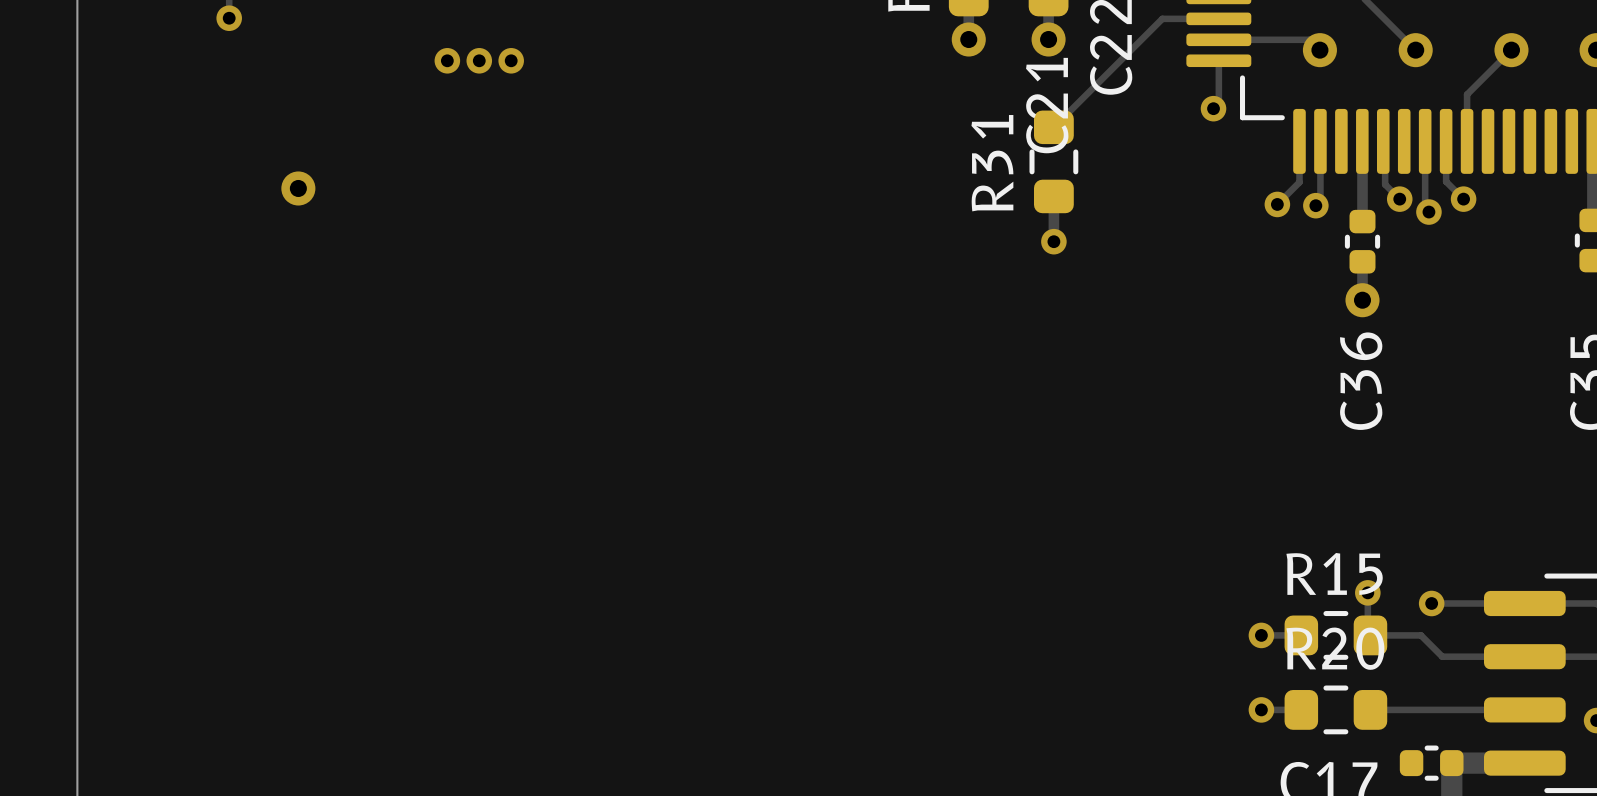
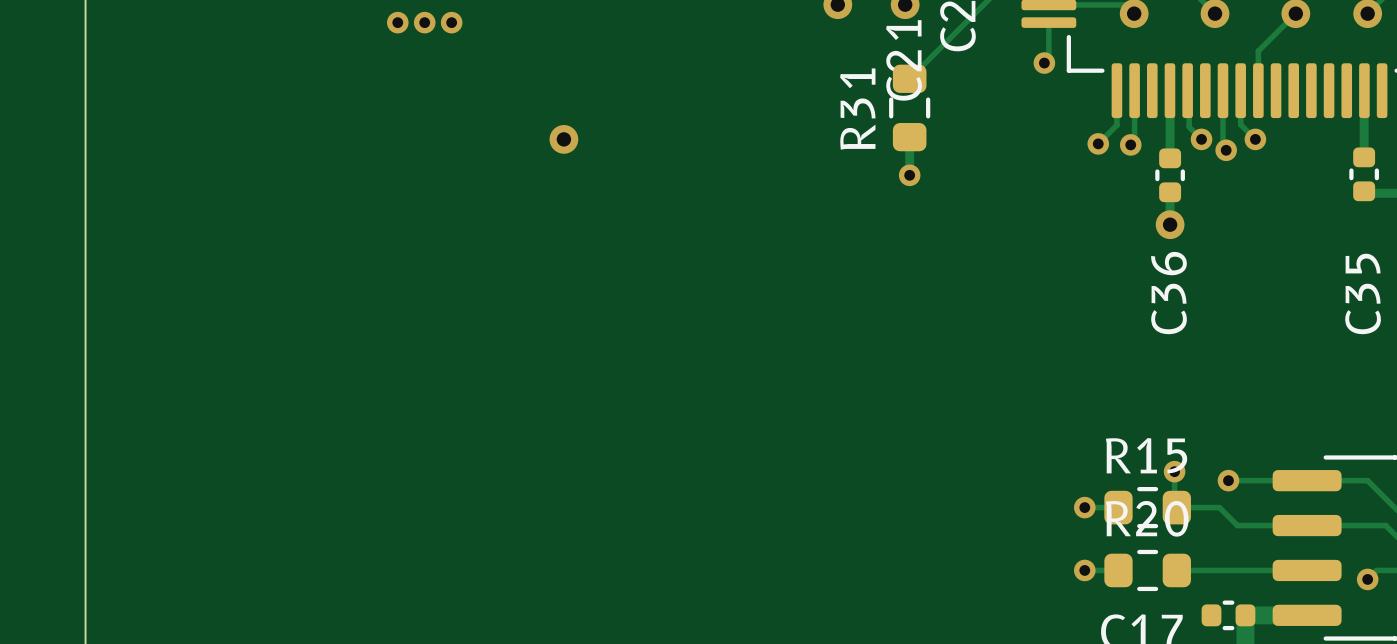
via: (298, 188) -> none
via: none -> (563, 139)

